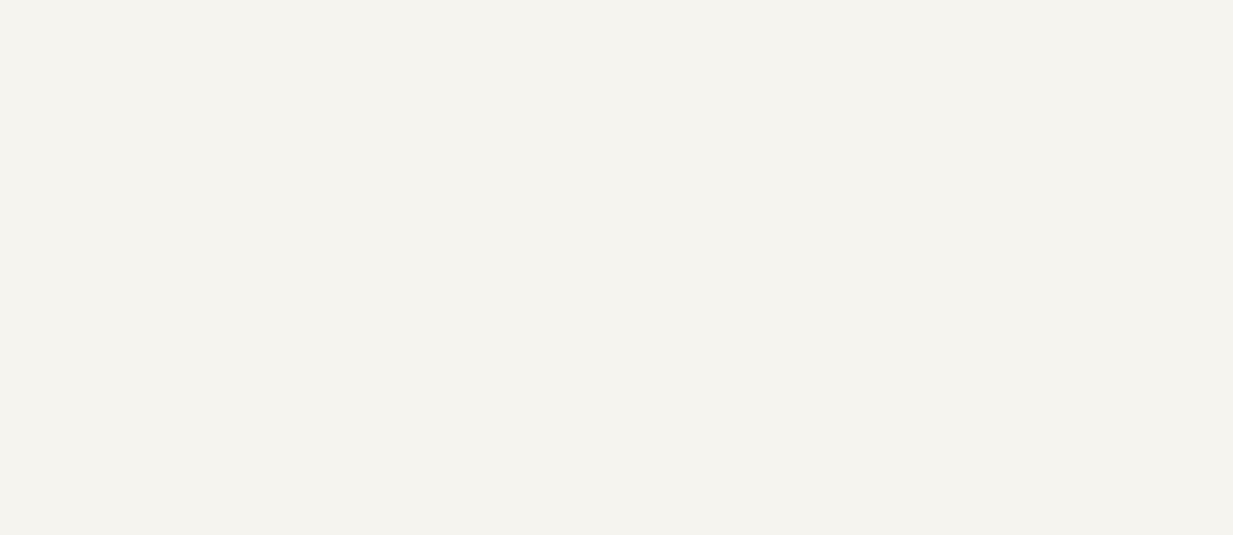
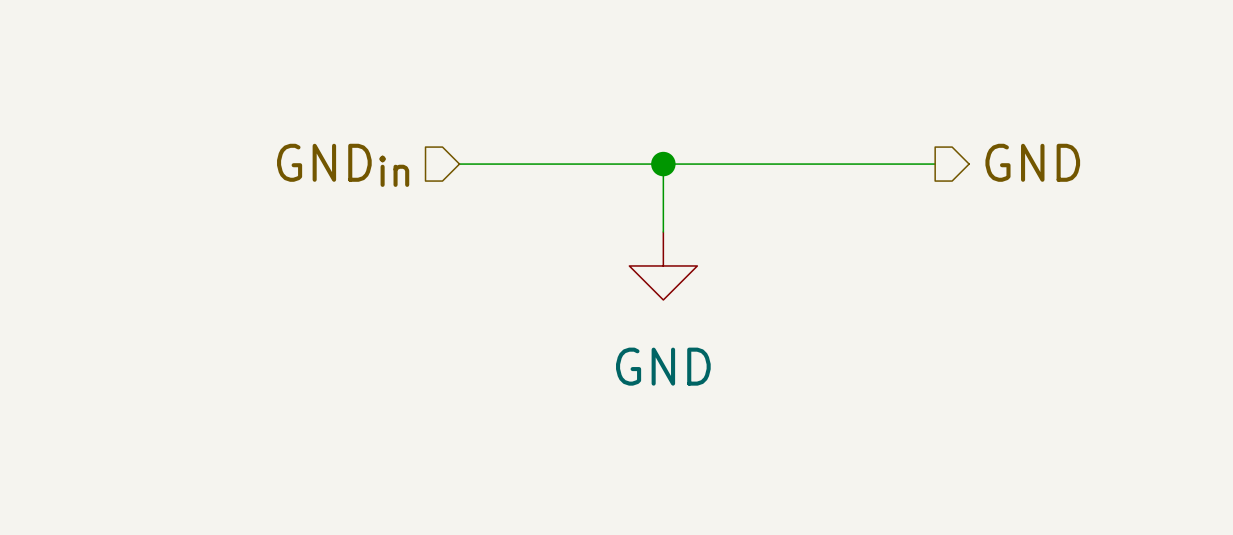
hierarchical label: none -> GND (1032, 162)
wire: none -> (459, 164) (935, 164)
wire: none -> (663, 164) (663, 232)
junction: none -> (663, 164)
hierarchical label: none -> GNDin (343, 165)
power symbol: none -> GND (663, 265)

